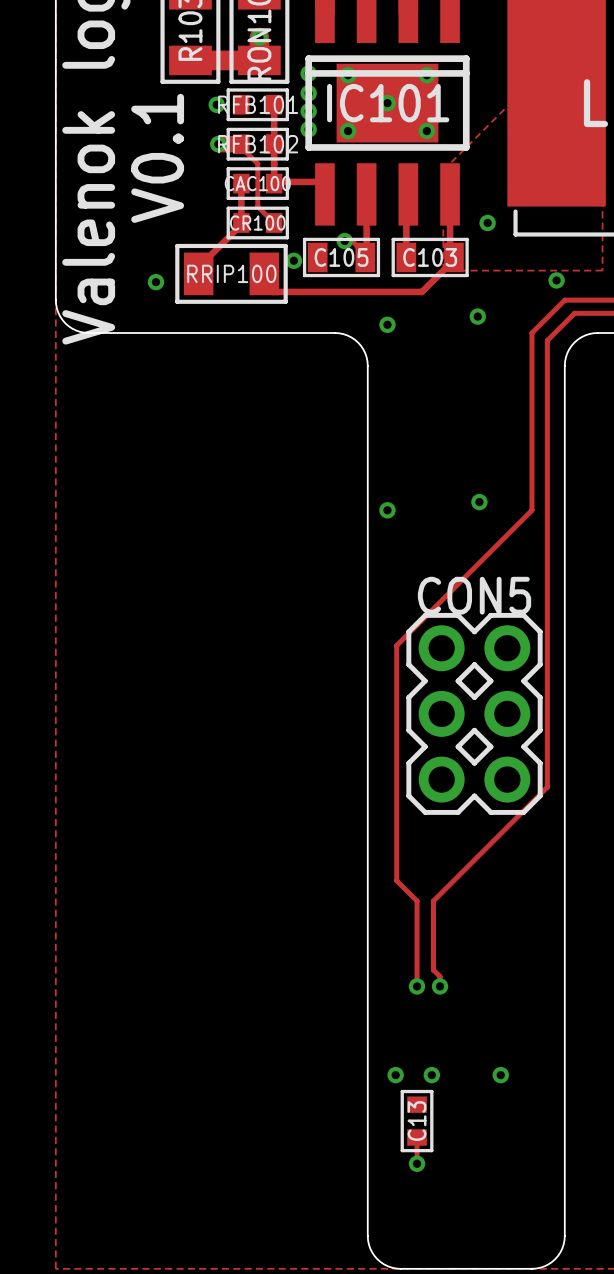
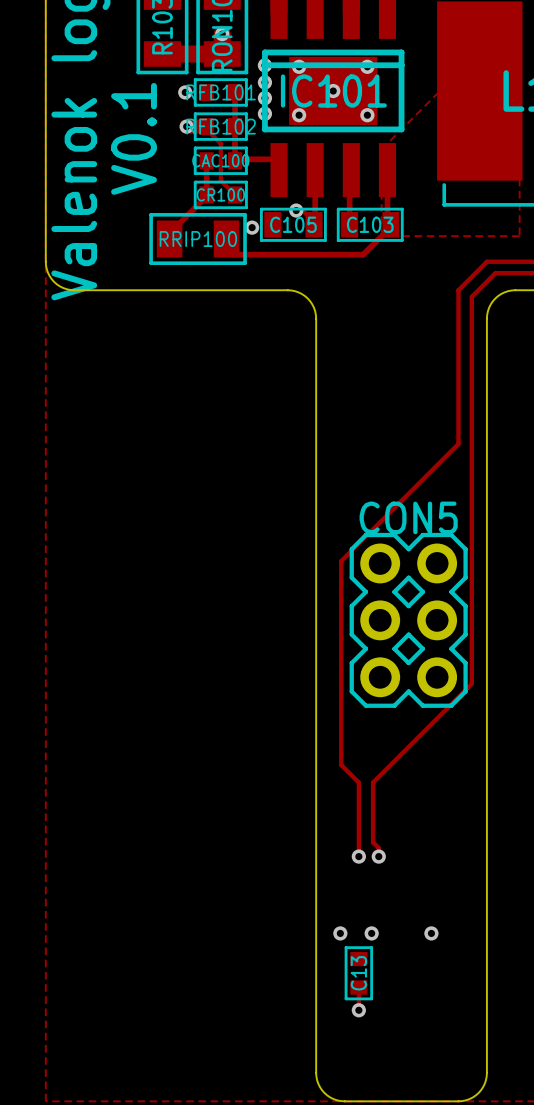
via: (487, 222) -> none
via: (556, 280) -> none
via: (155, 282) -> none
via: (477, 316) -> none
via: (387, 324) -> none
via: (479, 502) -> none
via: (387, 510) -> none

